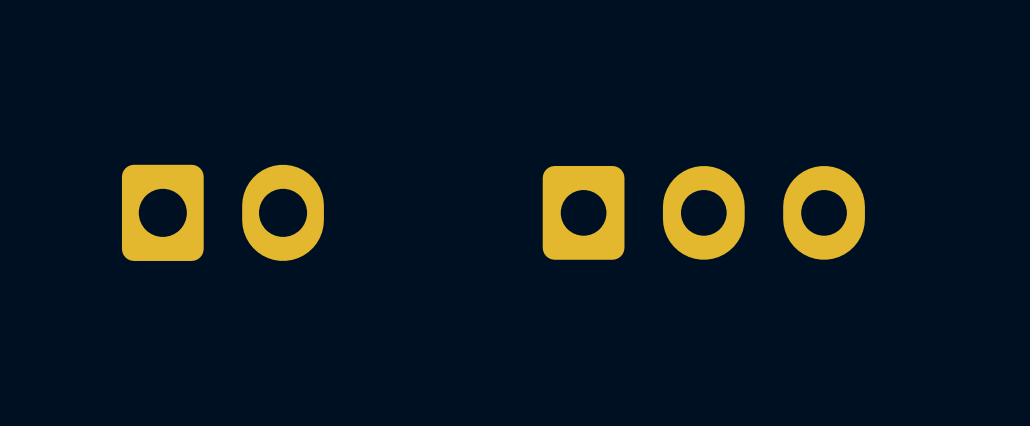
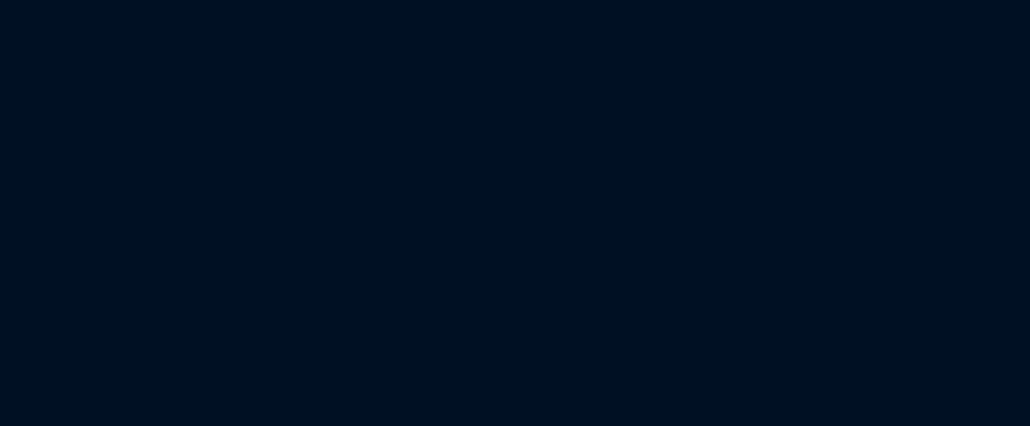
part: (222, 212) -> none
part: (703, 212) -> none

